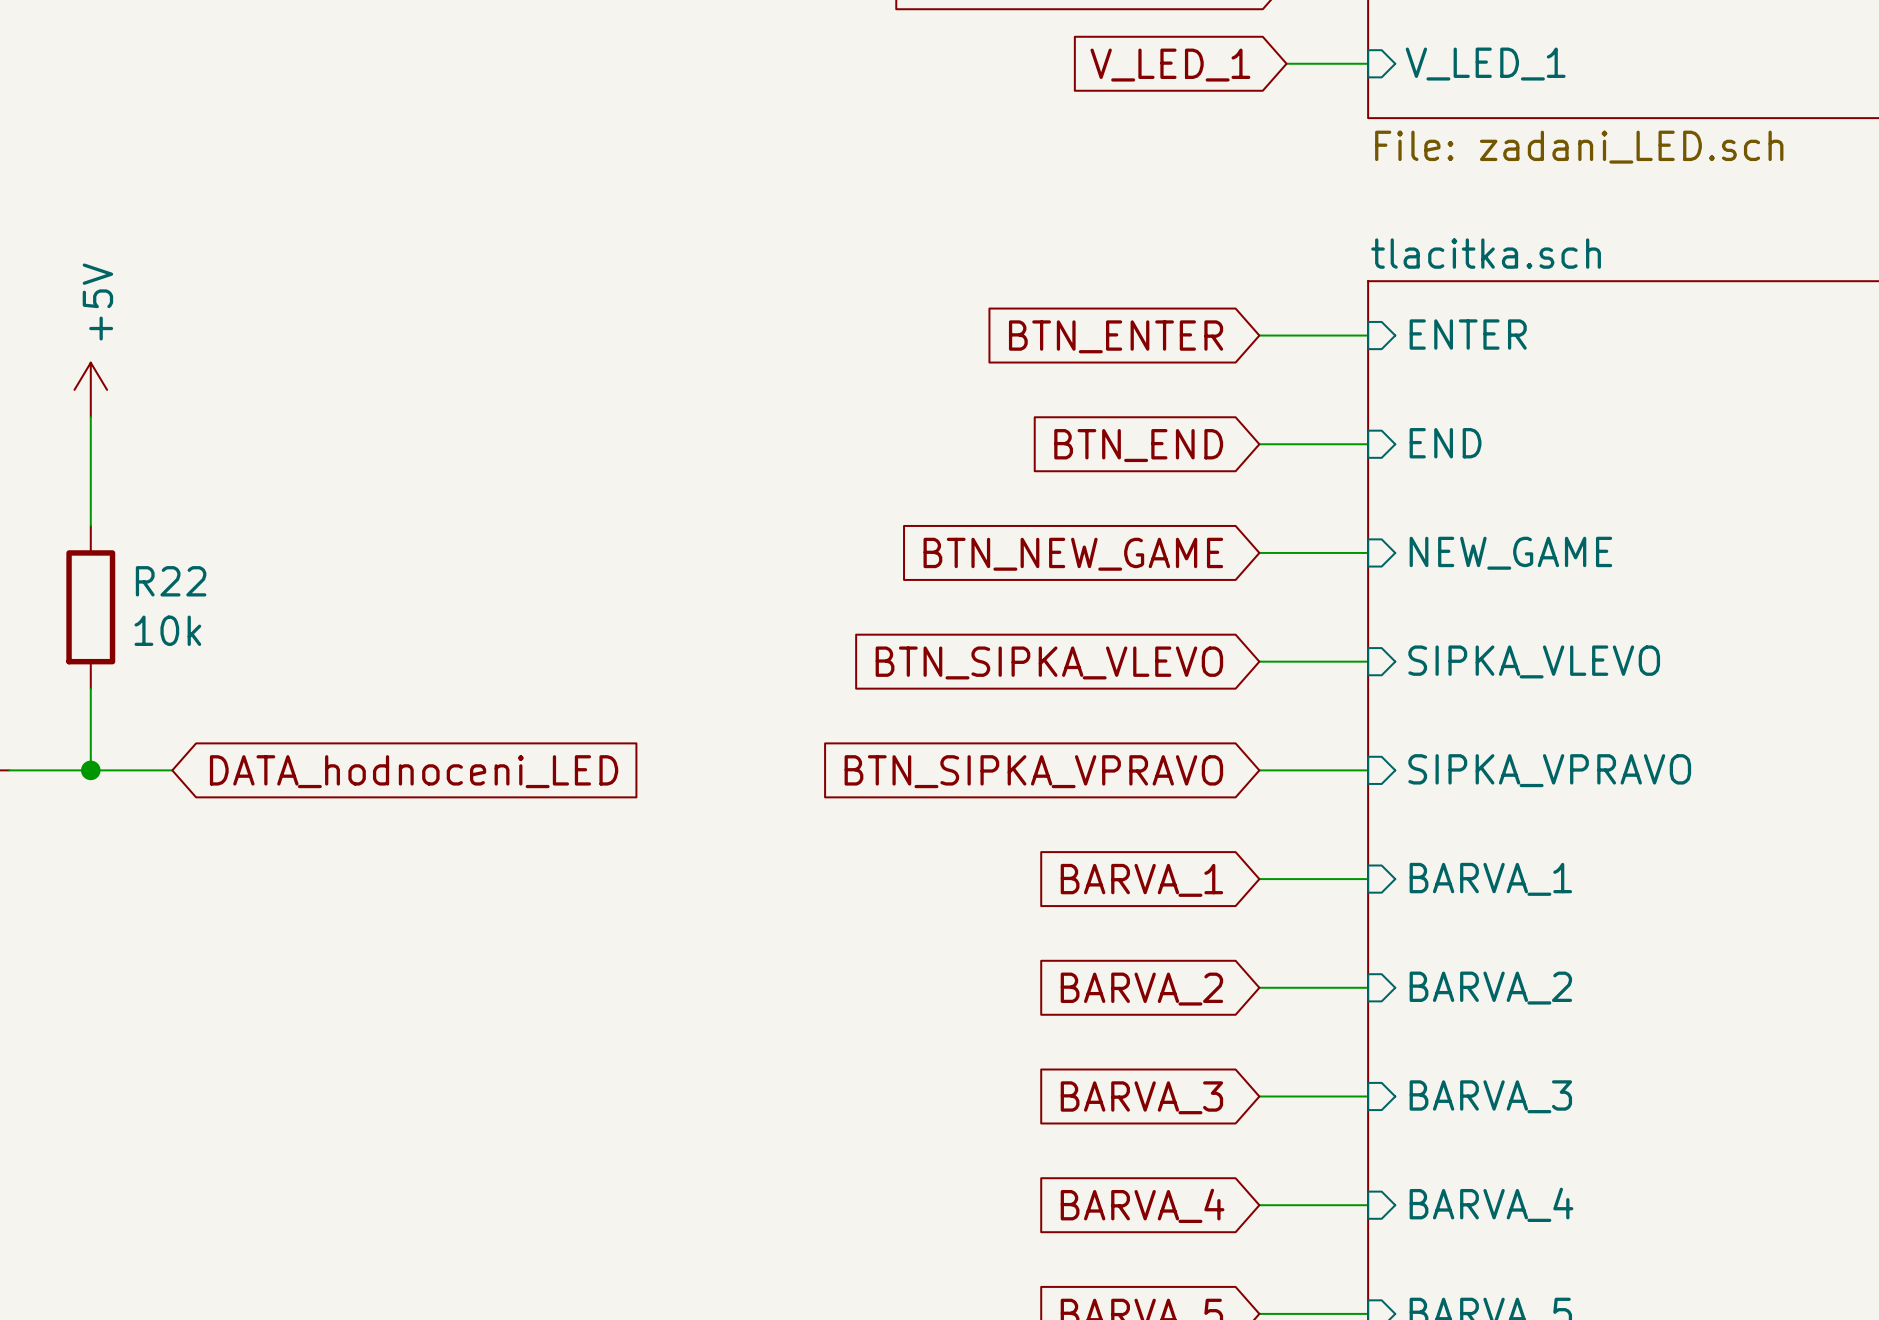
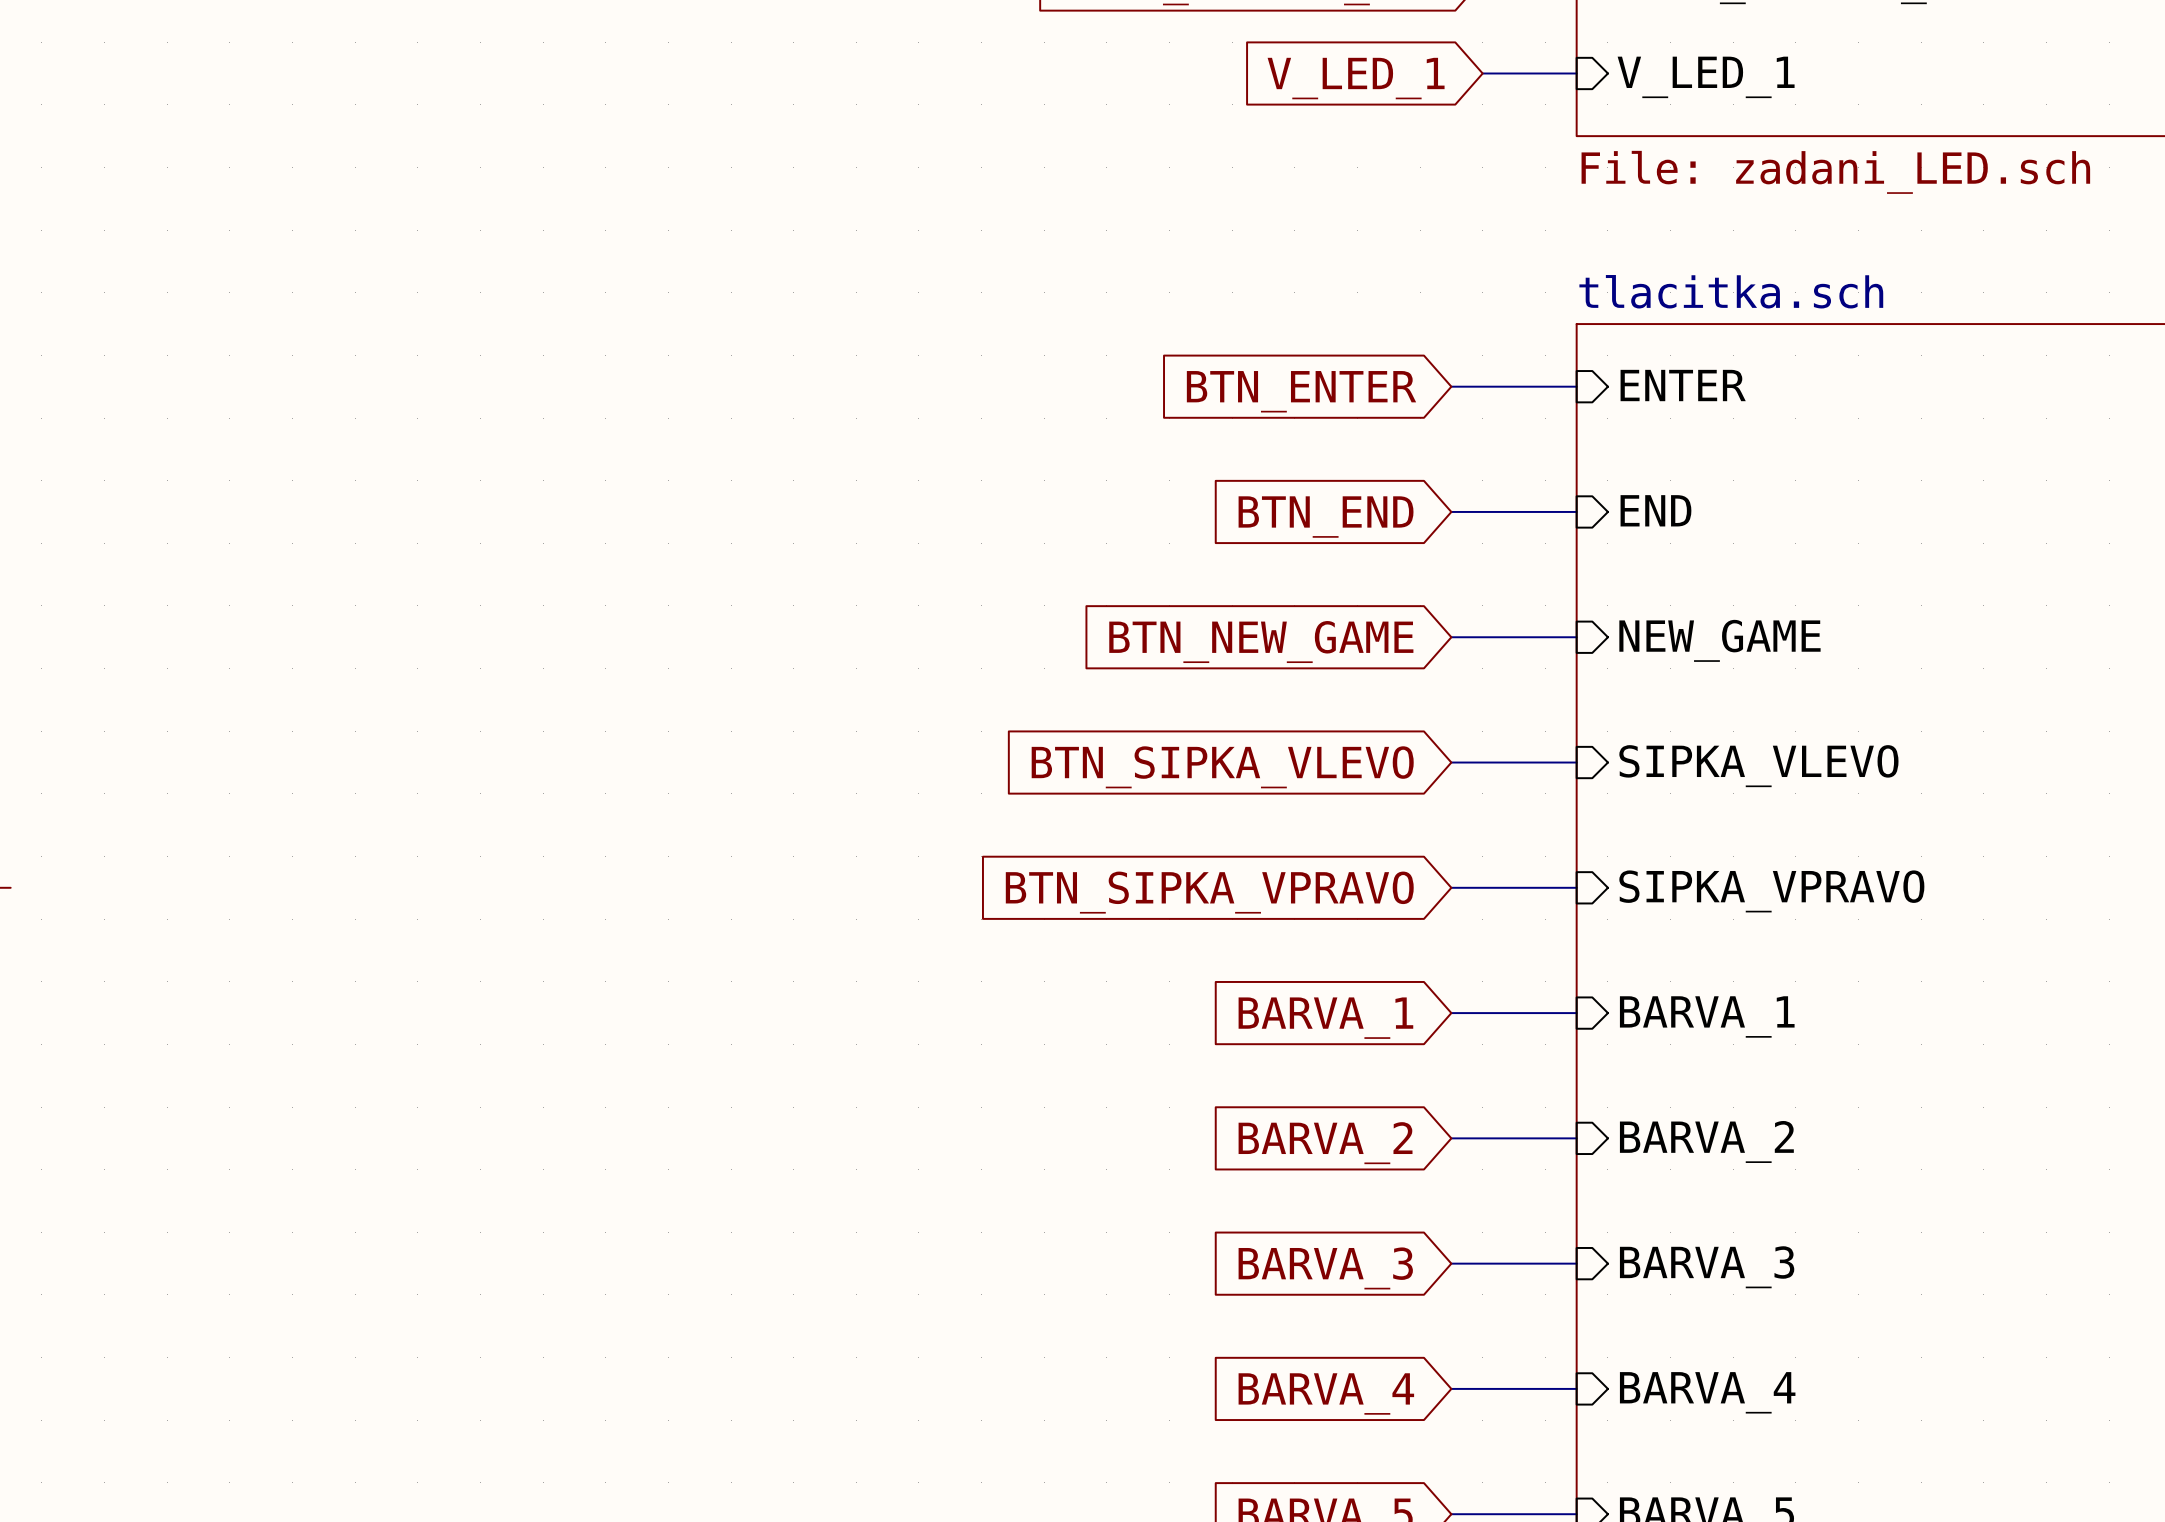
power symbol: +5V (90, 389) -> none
wire: (90, 417) (90, 525) -> none
R22: 10k (90, 607) -> none
wire: (90, 688) (90, 770) -> none
wire: (9, 770) (172, 770) -> none
junction: (90, 770) -> none
global label: DATA_hodnoceni_LED (414, 771) -> none

